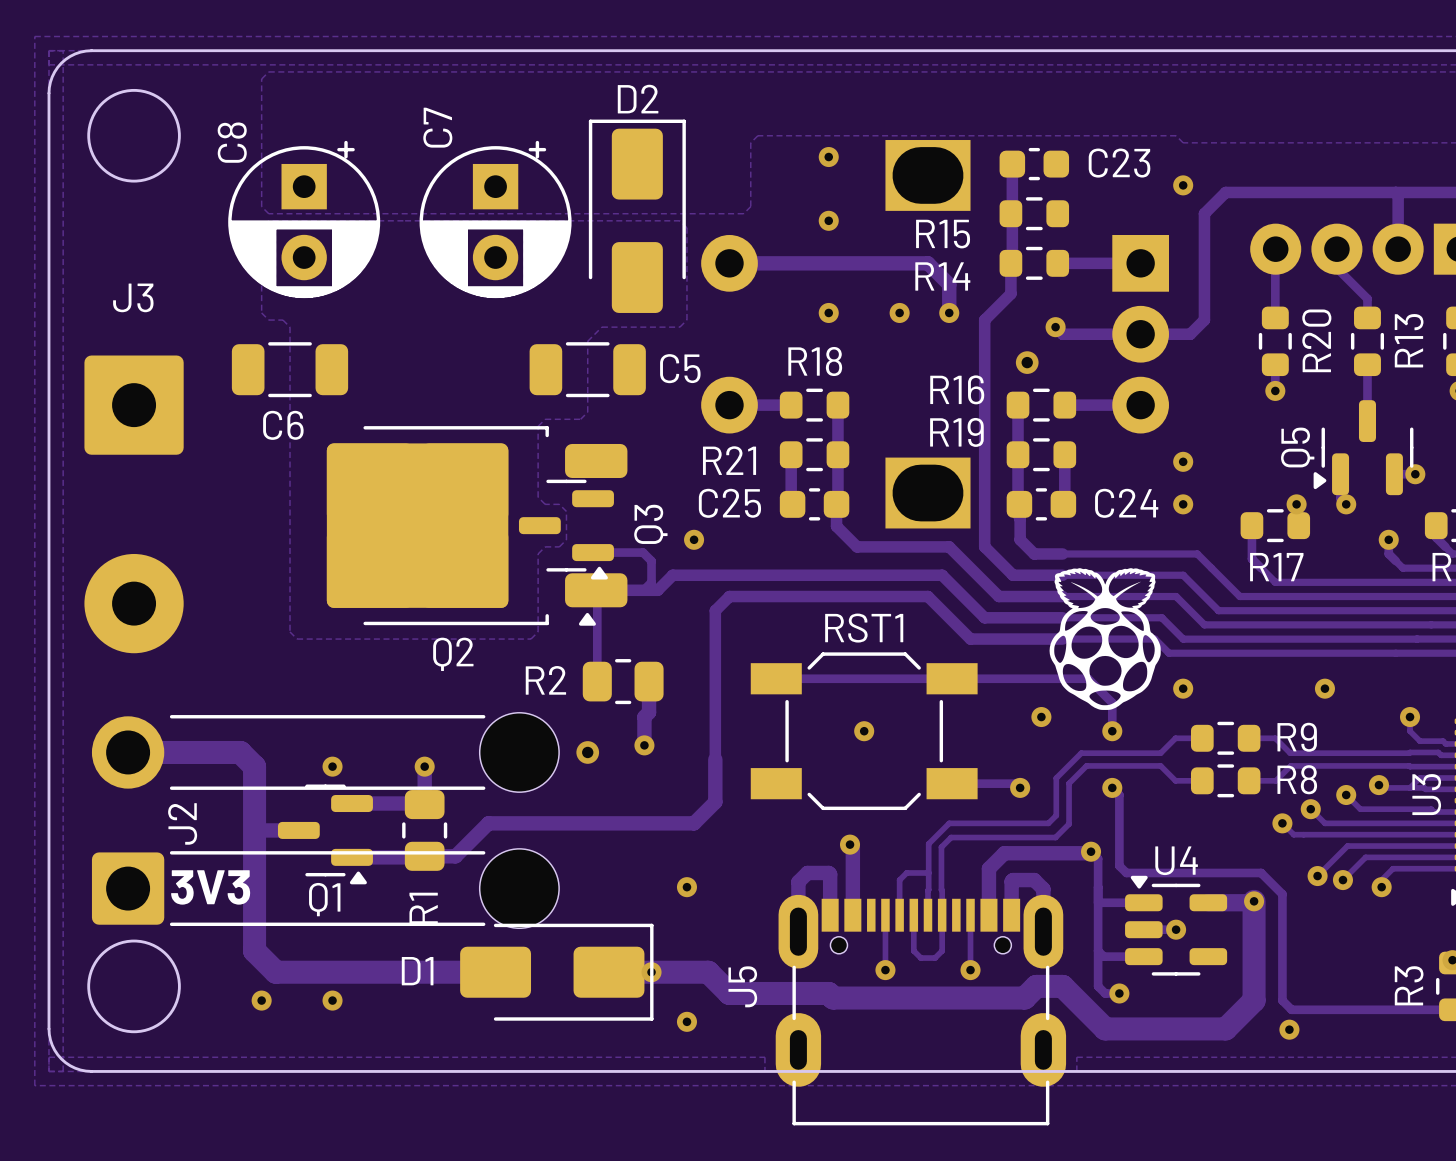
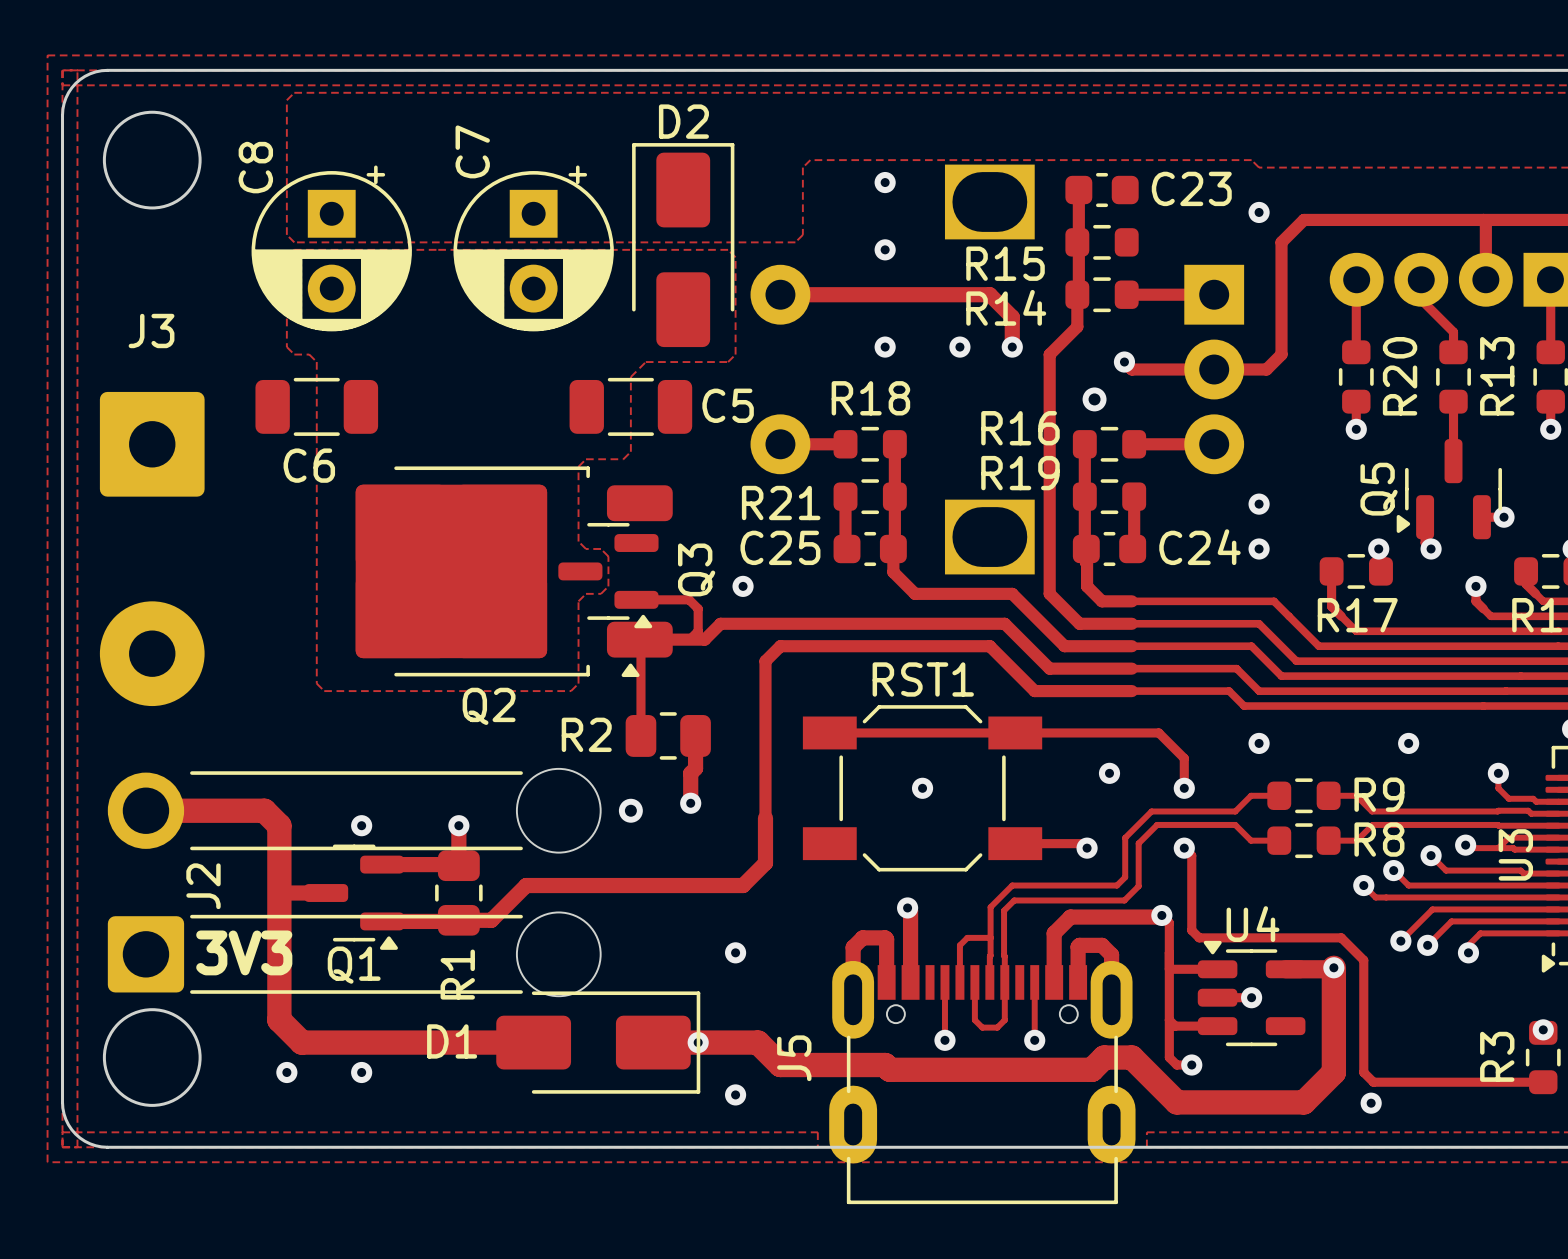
drawing: [1049, 568, 1161, 710] -> none

